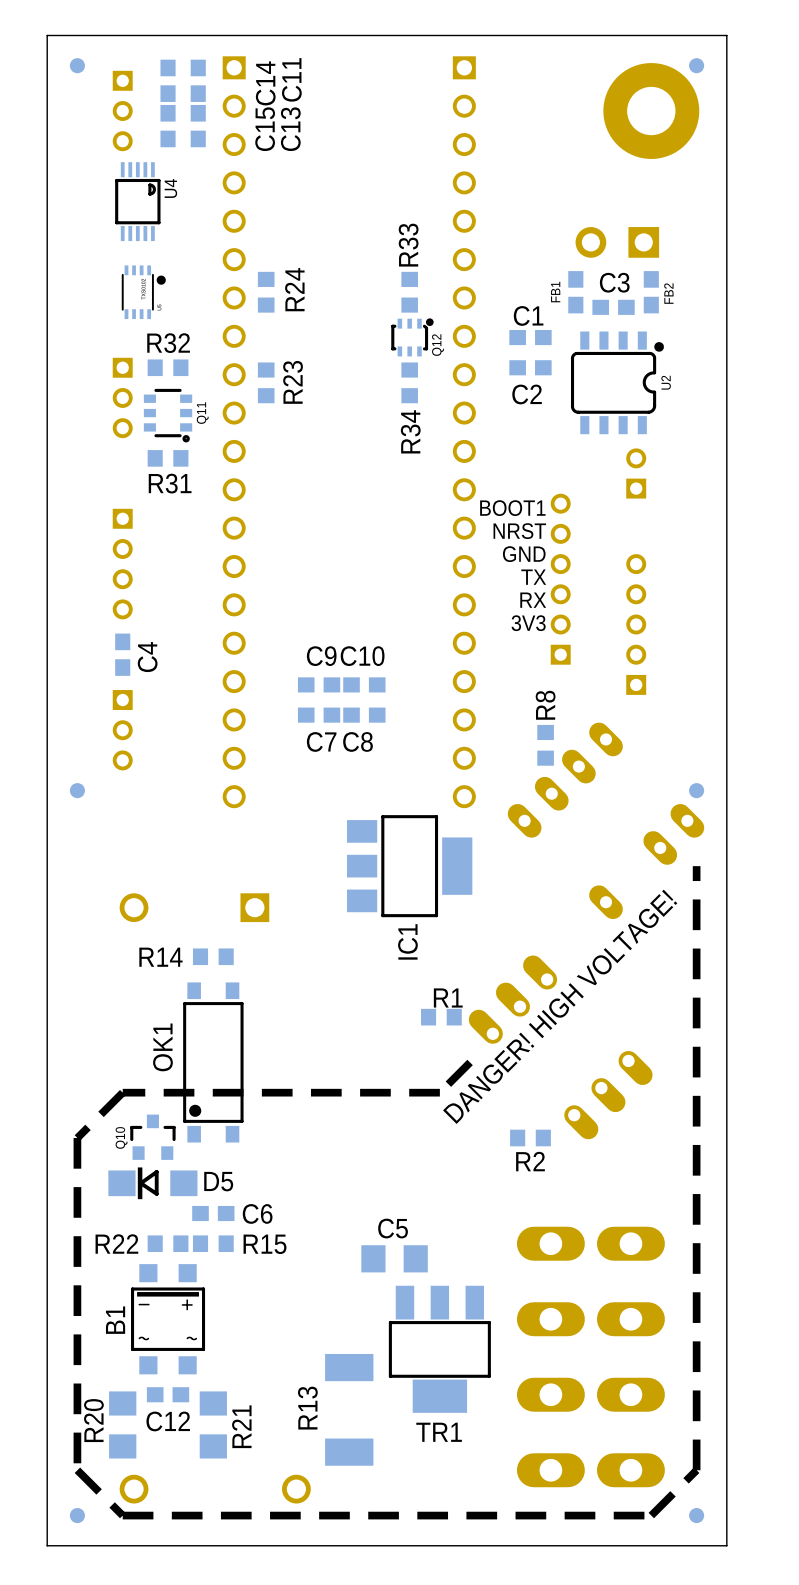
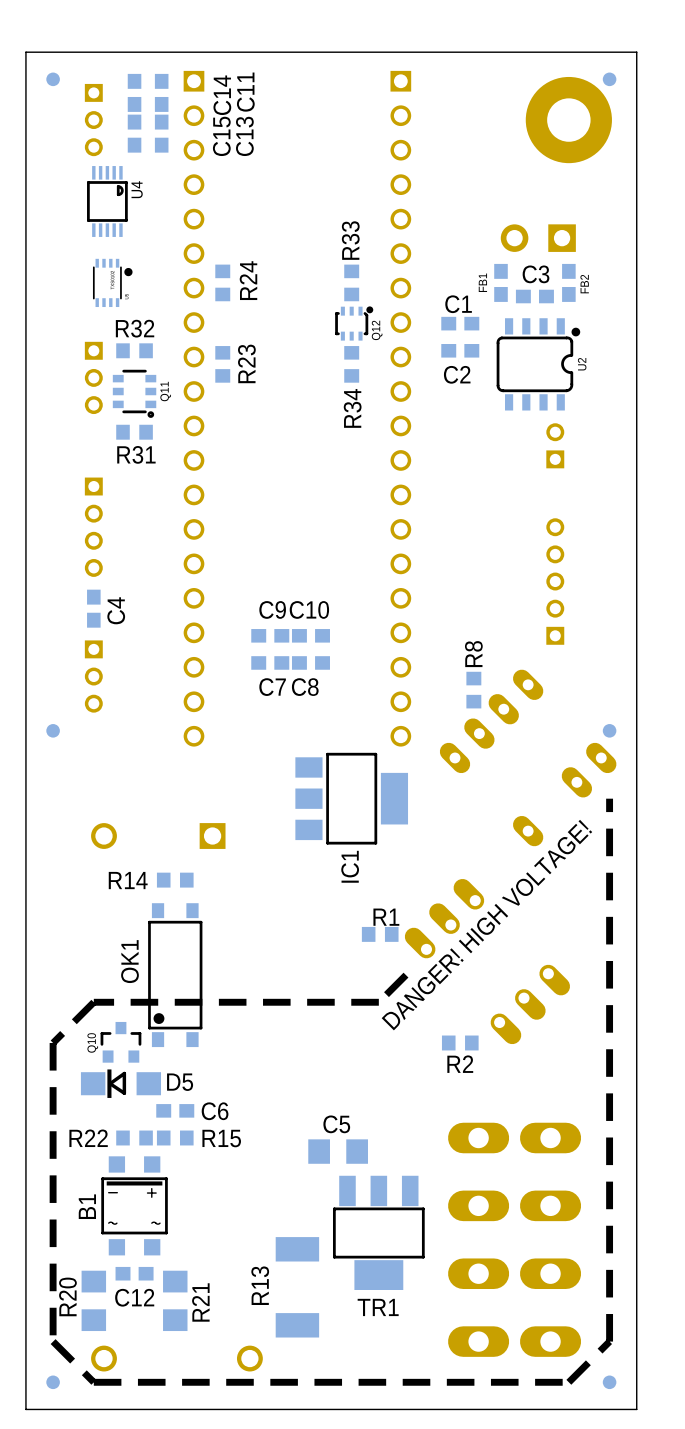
text: BOOT1 (512, 508) -> none
text: NRST (519, 531) -> none
text: GND (524, 554) -> none
text: TX (533, 577) -> none
part: (560, 579) -> none
text: RX (533, 600) -> none
text: 3V3 (528, 623) -> none

